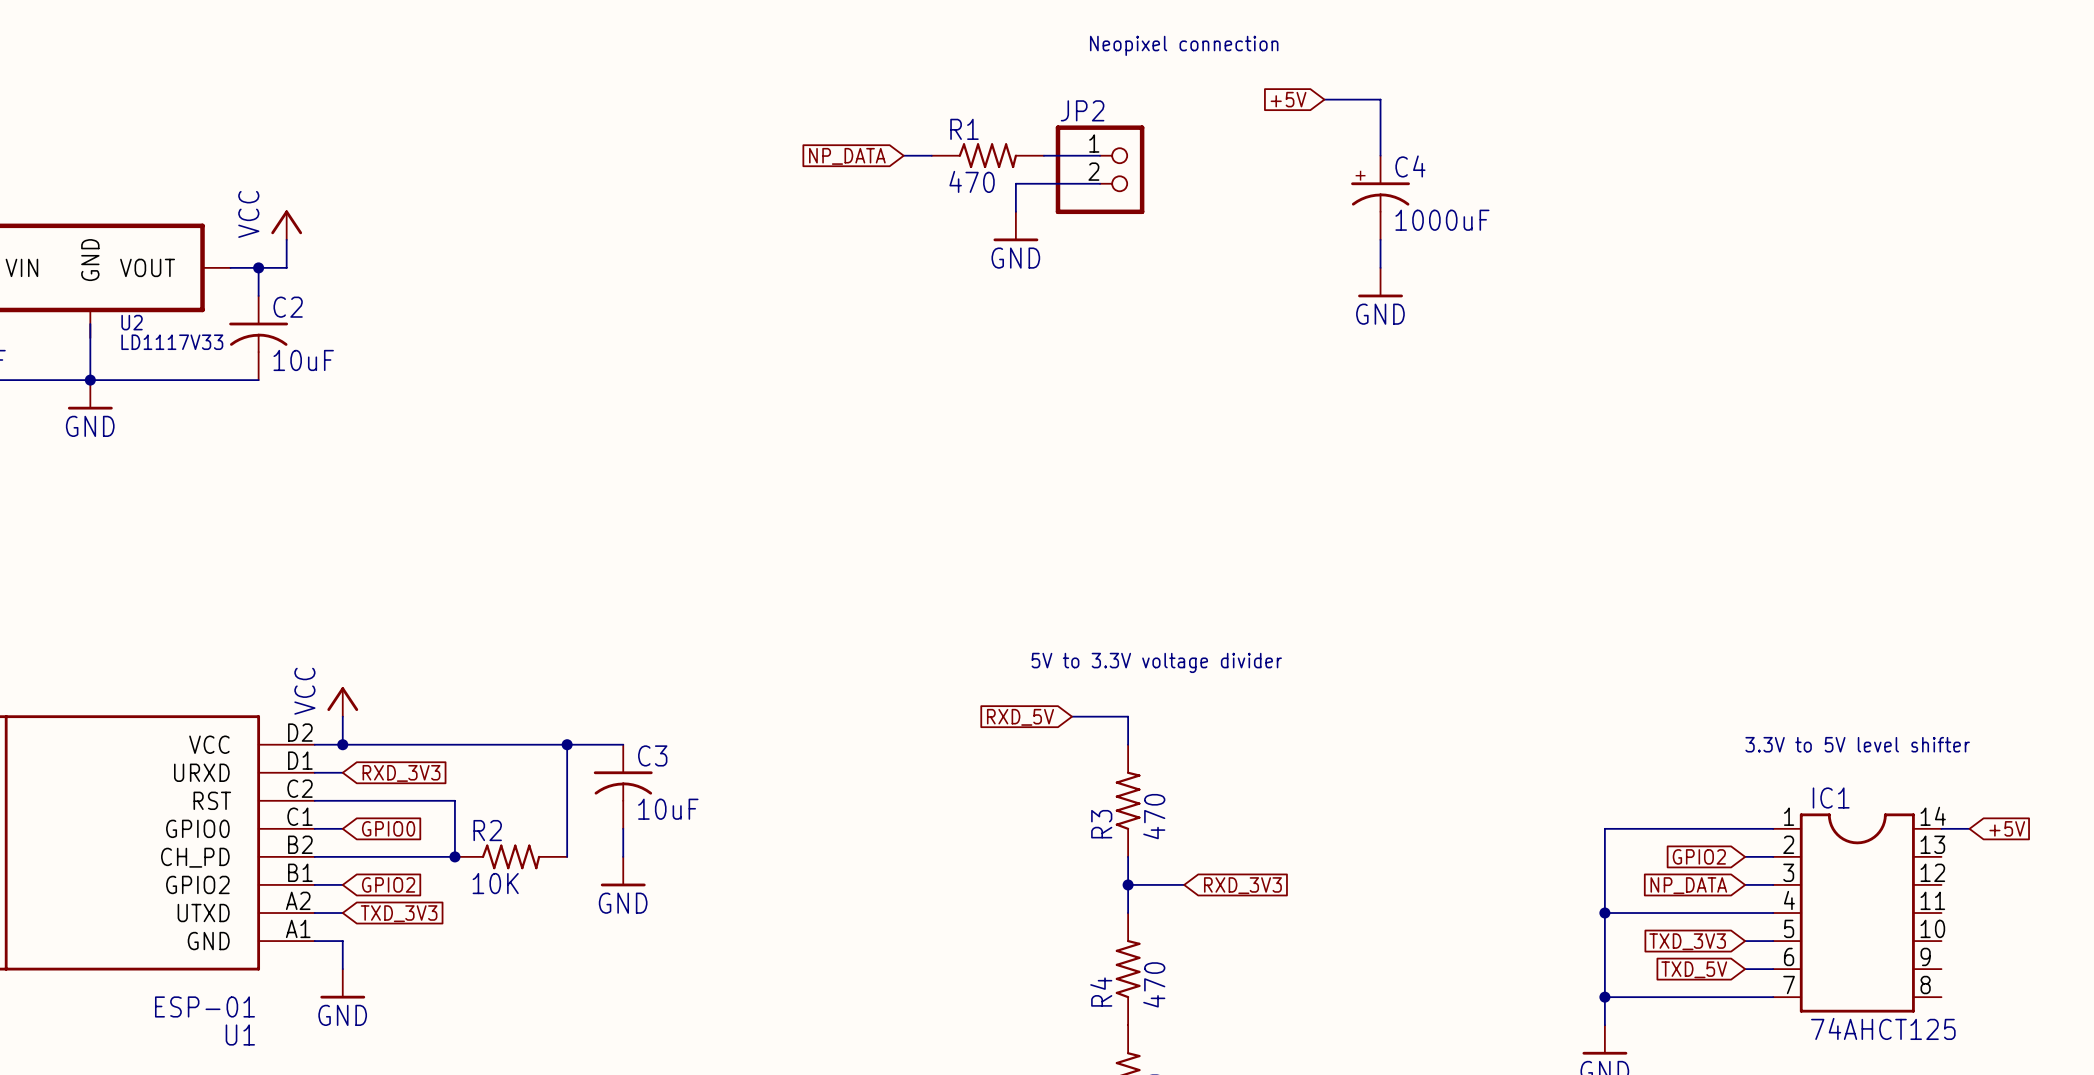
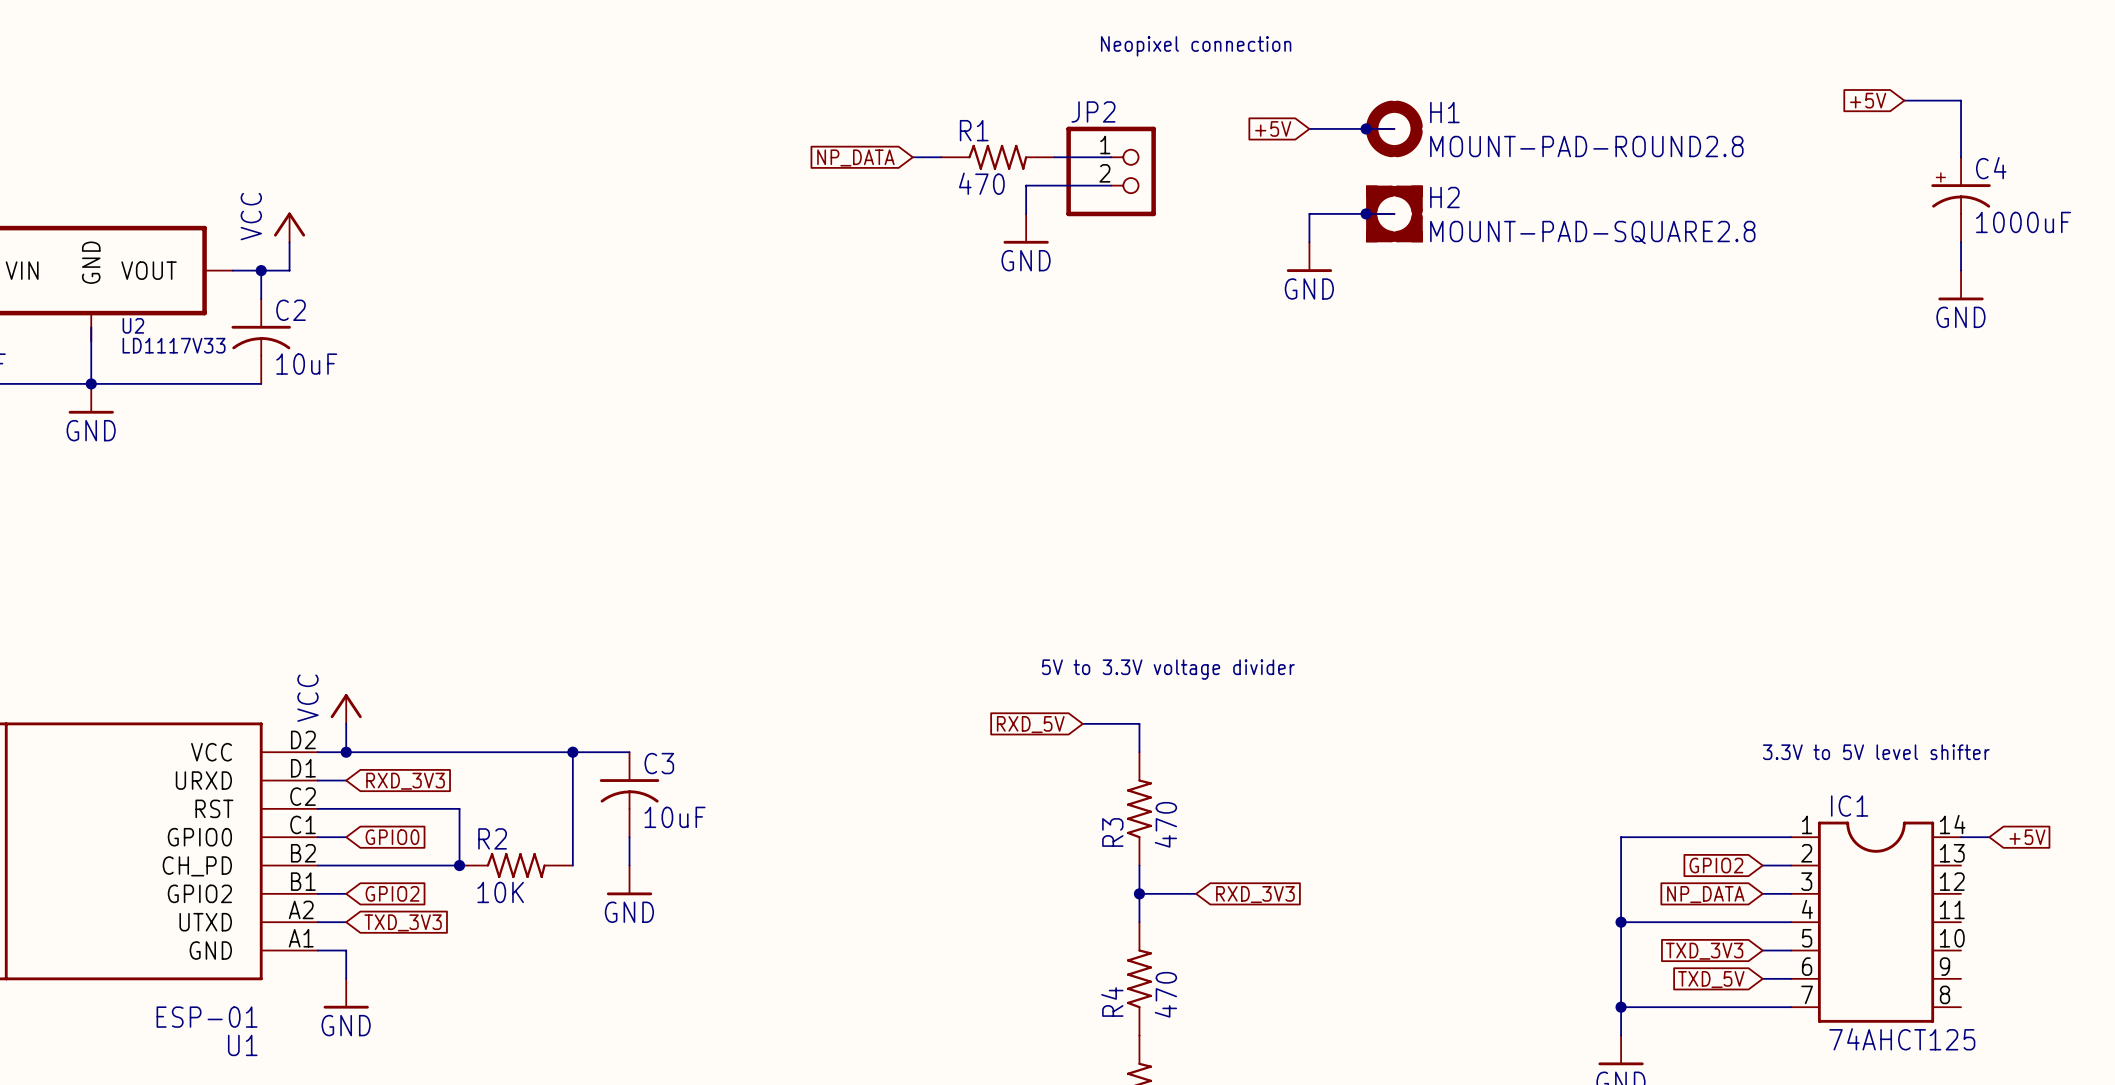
global label position: +5V (1288, 99) -> +5V (1273, 128)
wire: (1324, 99) (1380, 99) (1380, 155) -> none
global label: none -> +5V (1868, 100)
wire: none -> (1904, 100) (1961, 100) (1961, 157)
wire: none -> (1309, 128) (1394, 128)
junction: none -> (1366, 128)
H1: none -> MOUNT-PAD-ROUND2.8 (1394, 128)
C4 position: (1380, 197) -> (1961, 199)
junction: none -> (1366, 213)
wire: none -> (1394, 213) (1309, 213) (1309, 242)
H2: none -> MOUNT-PAD-SQUARE2.8 (1394, 213)
wire: (1380, 239) (1380, 267) -> none
wire: none -> (1961, 242) (1961, 270)
power symbol position: GND (1380, 282) -> GND (1309, 257)
power symbol: none -> GND (1961, 285)

